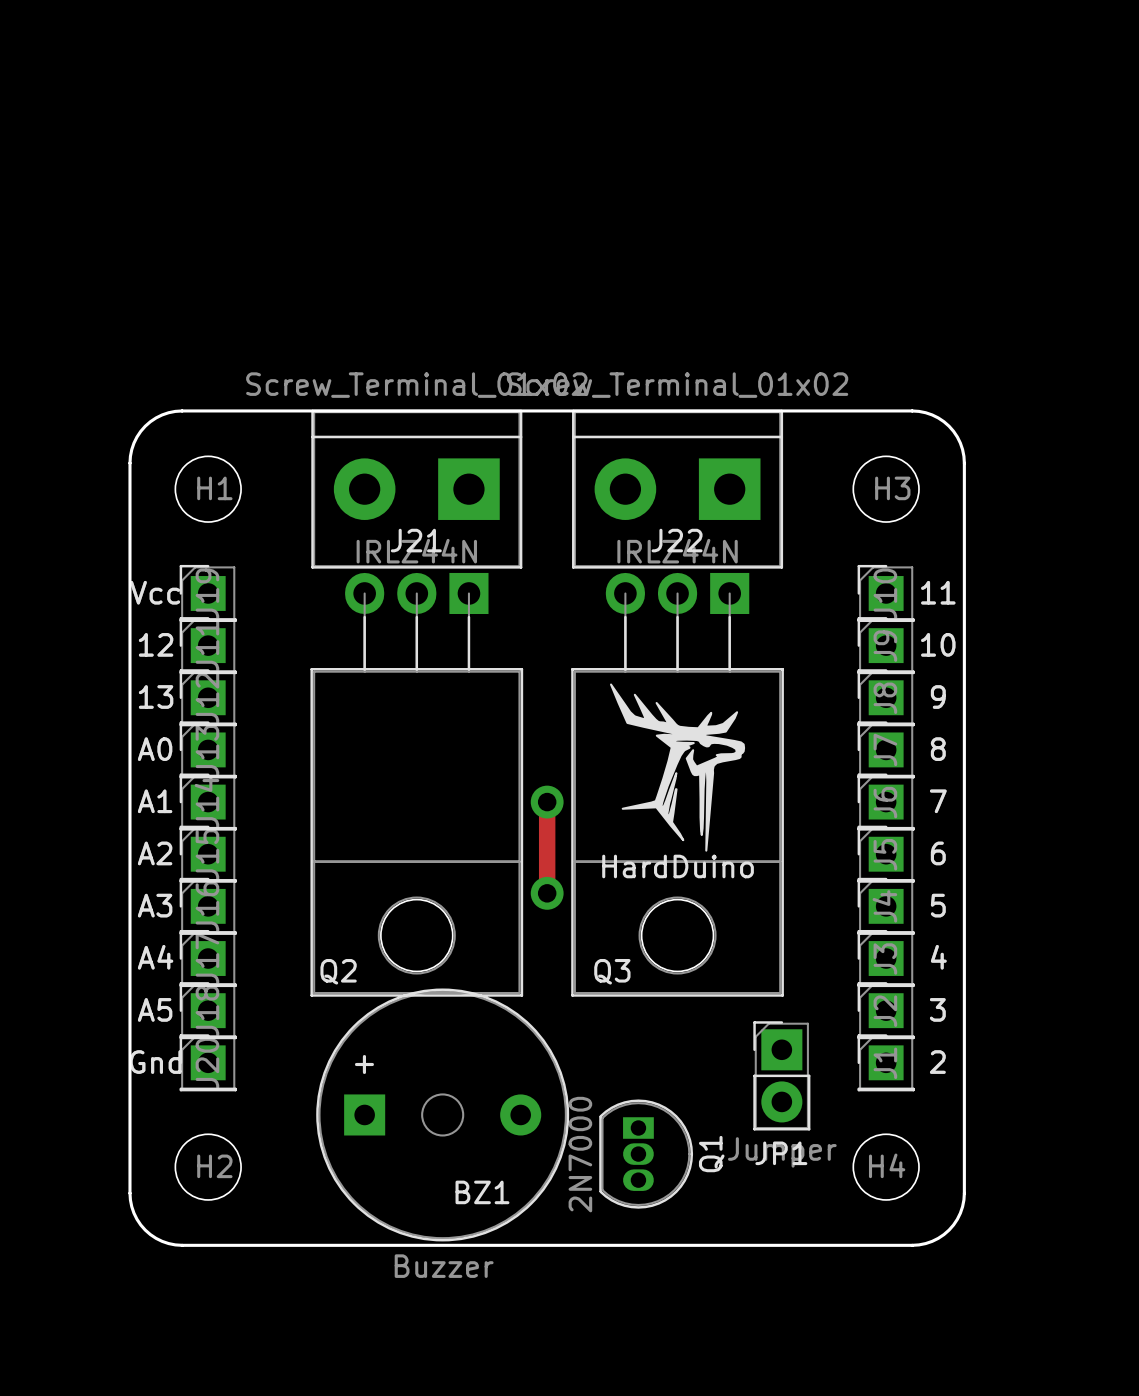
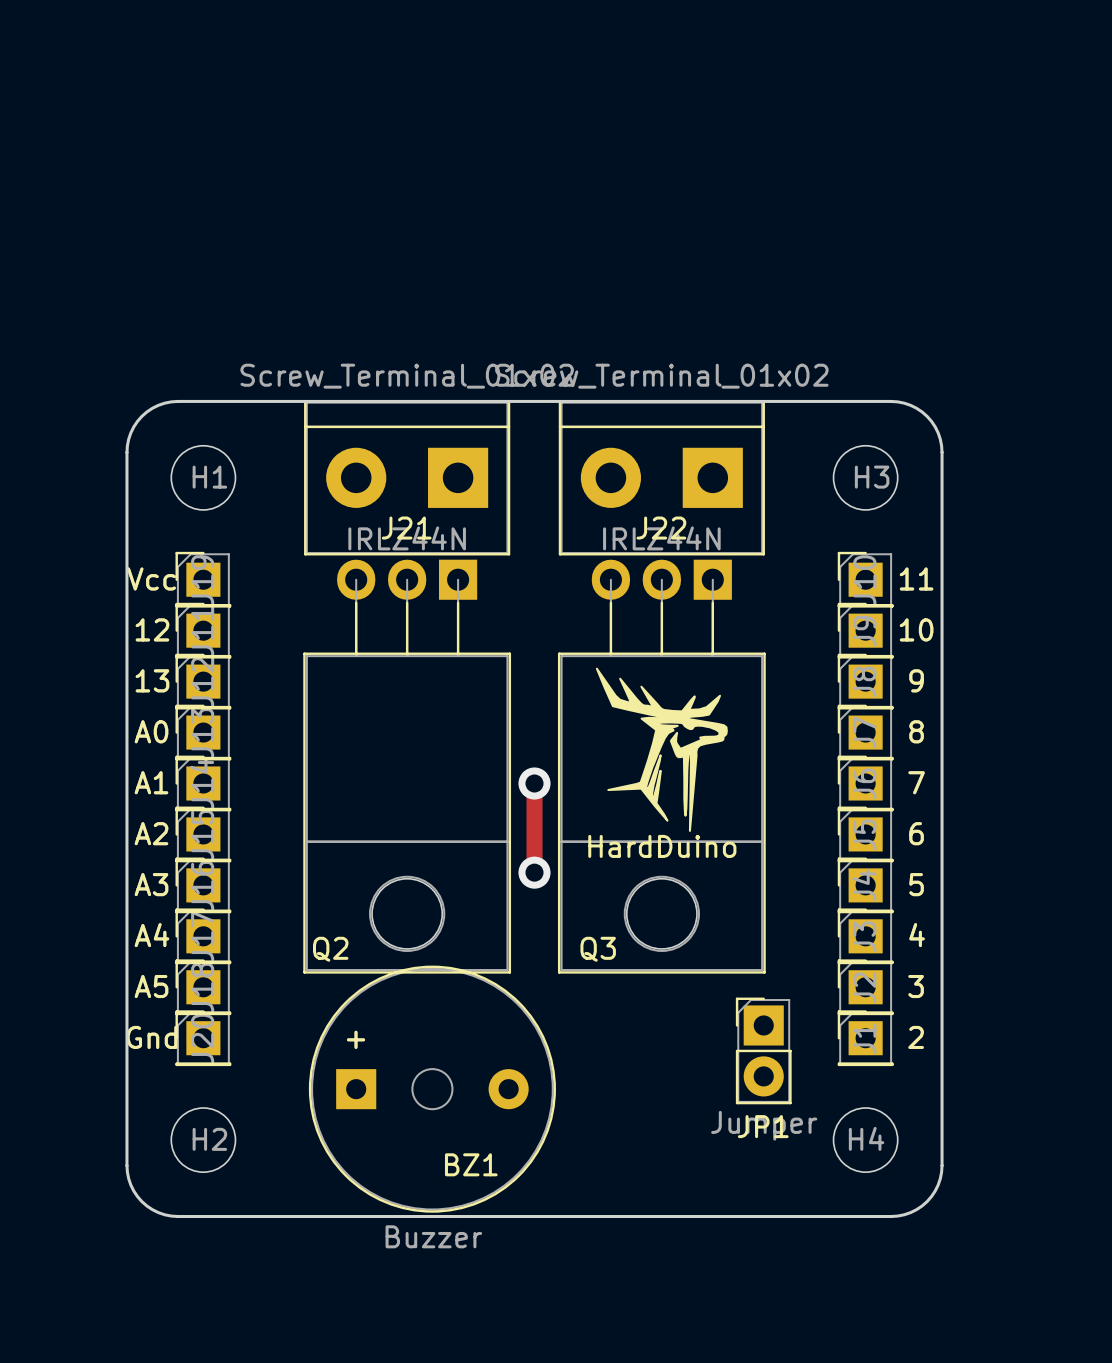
Q1: 2N7000 (646, 1154) -> none

